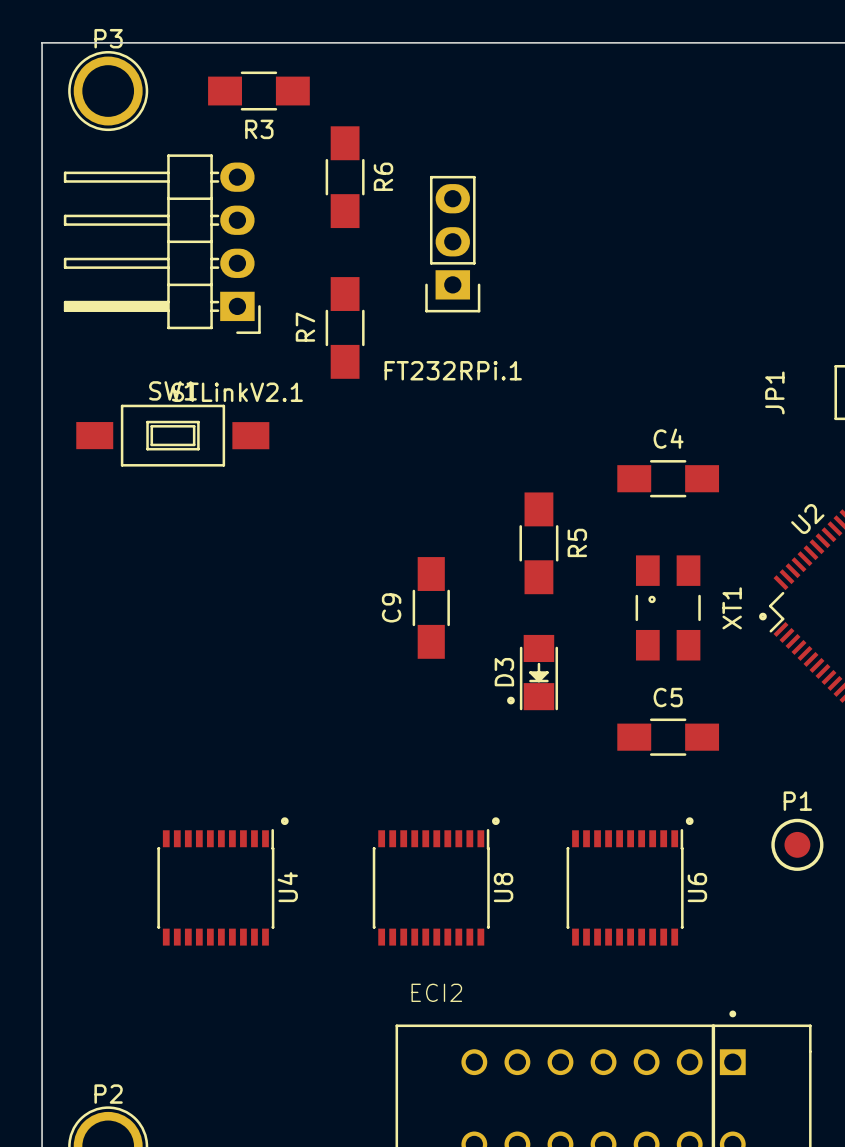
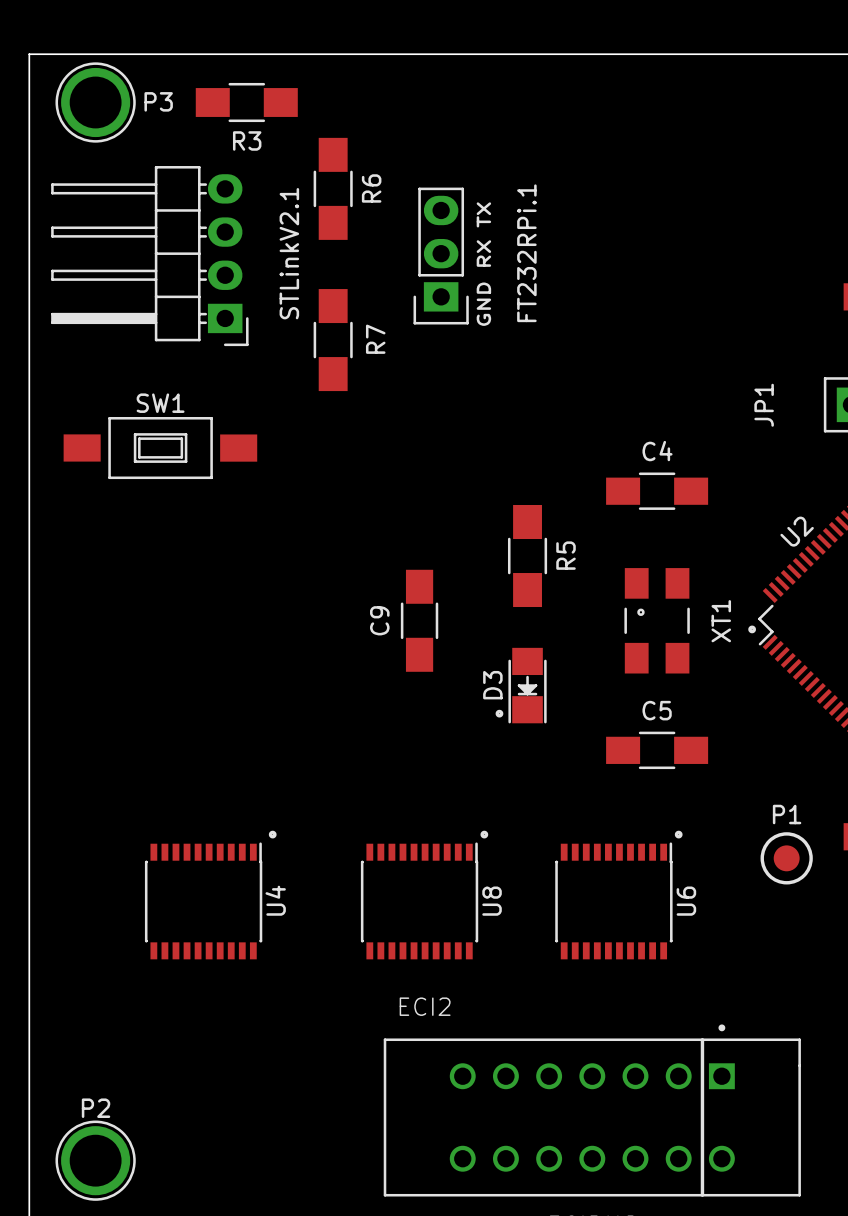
P3 name position: P3 (108, 38) -> P3 (158, 101)
text: none -> GND RX TX (483, 264)
R7 name position: R7 (305, 327) -> R7 (375, 339)
FT232RPi.1 name rotation: 0° (453, 370) -> 90° counterclockwise (526, 253)
STLinkV2.1 name rotation: 0° (237, 392) -> 90° counterclockwise (289, 253)

